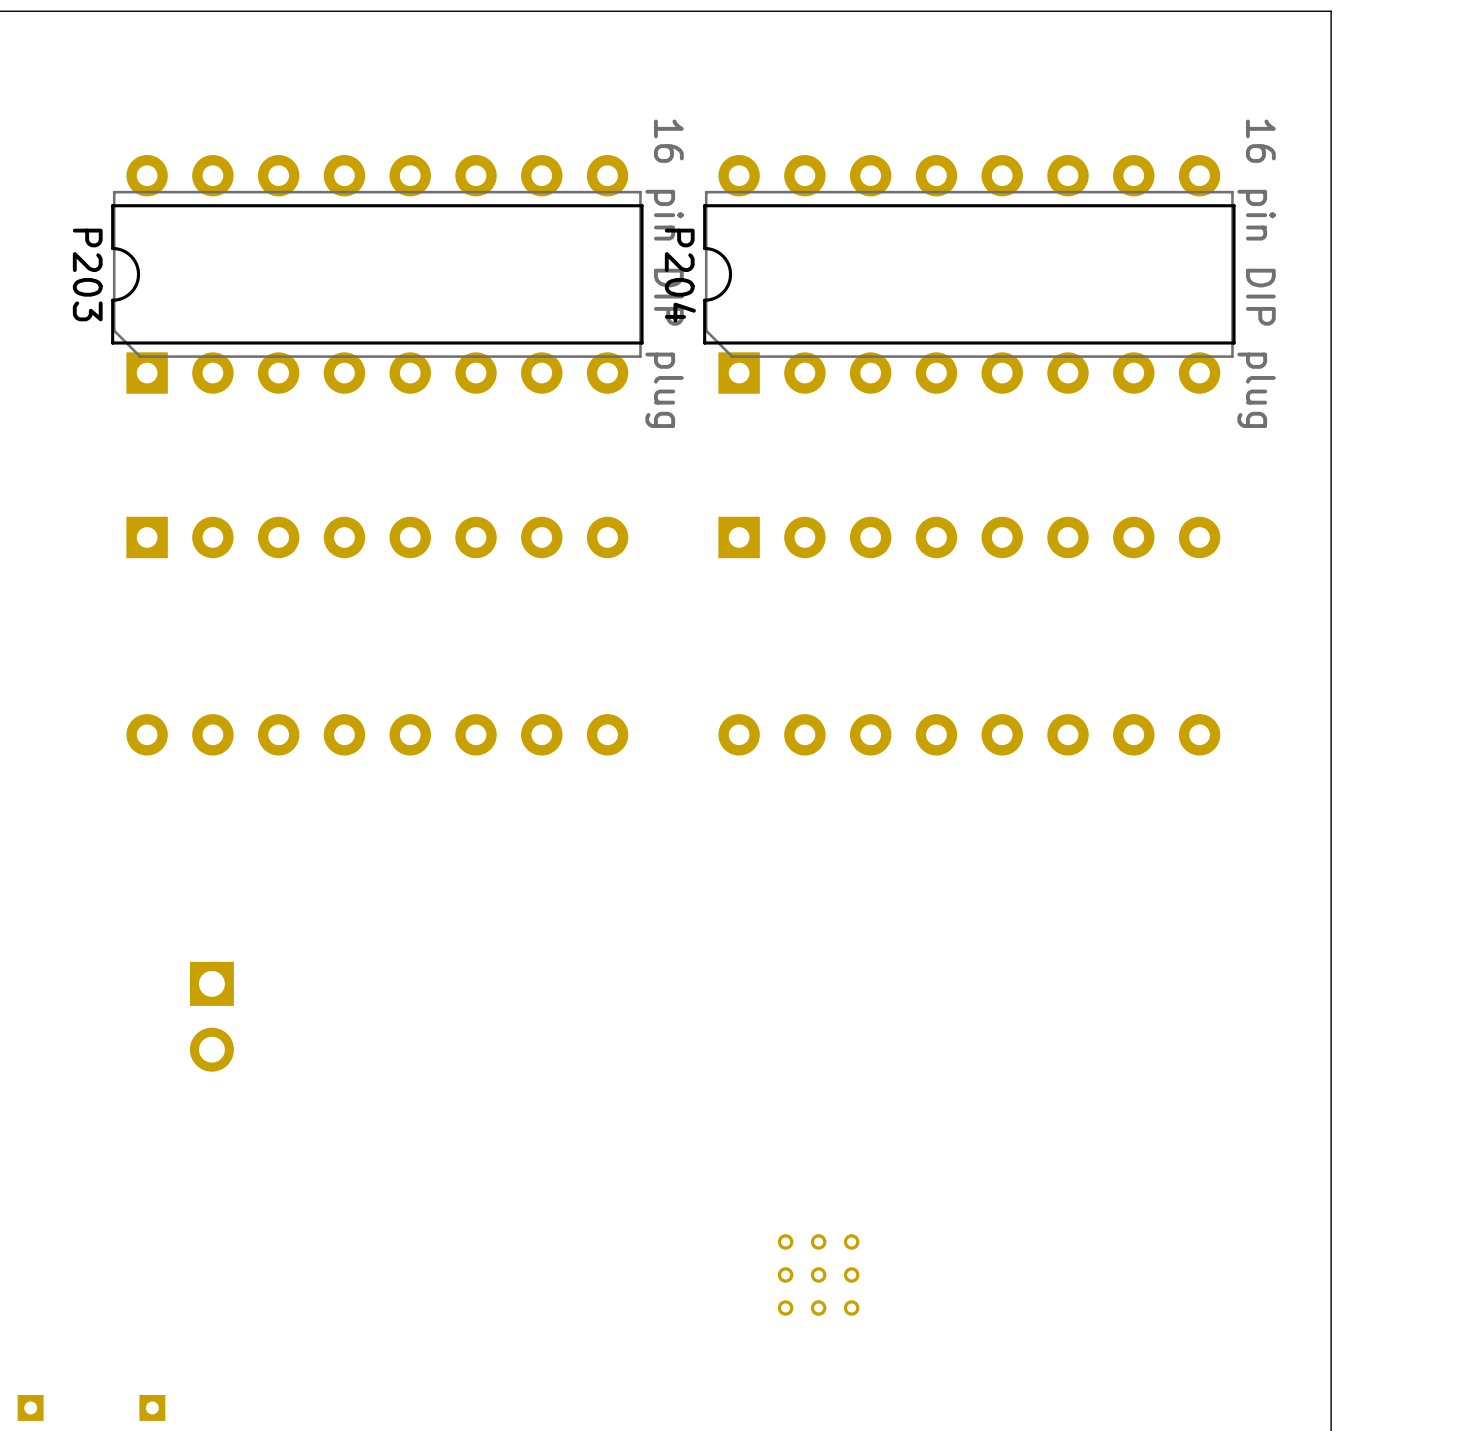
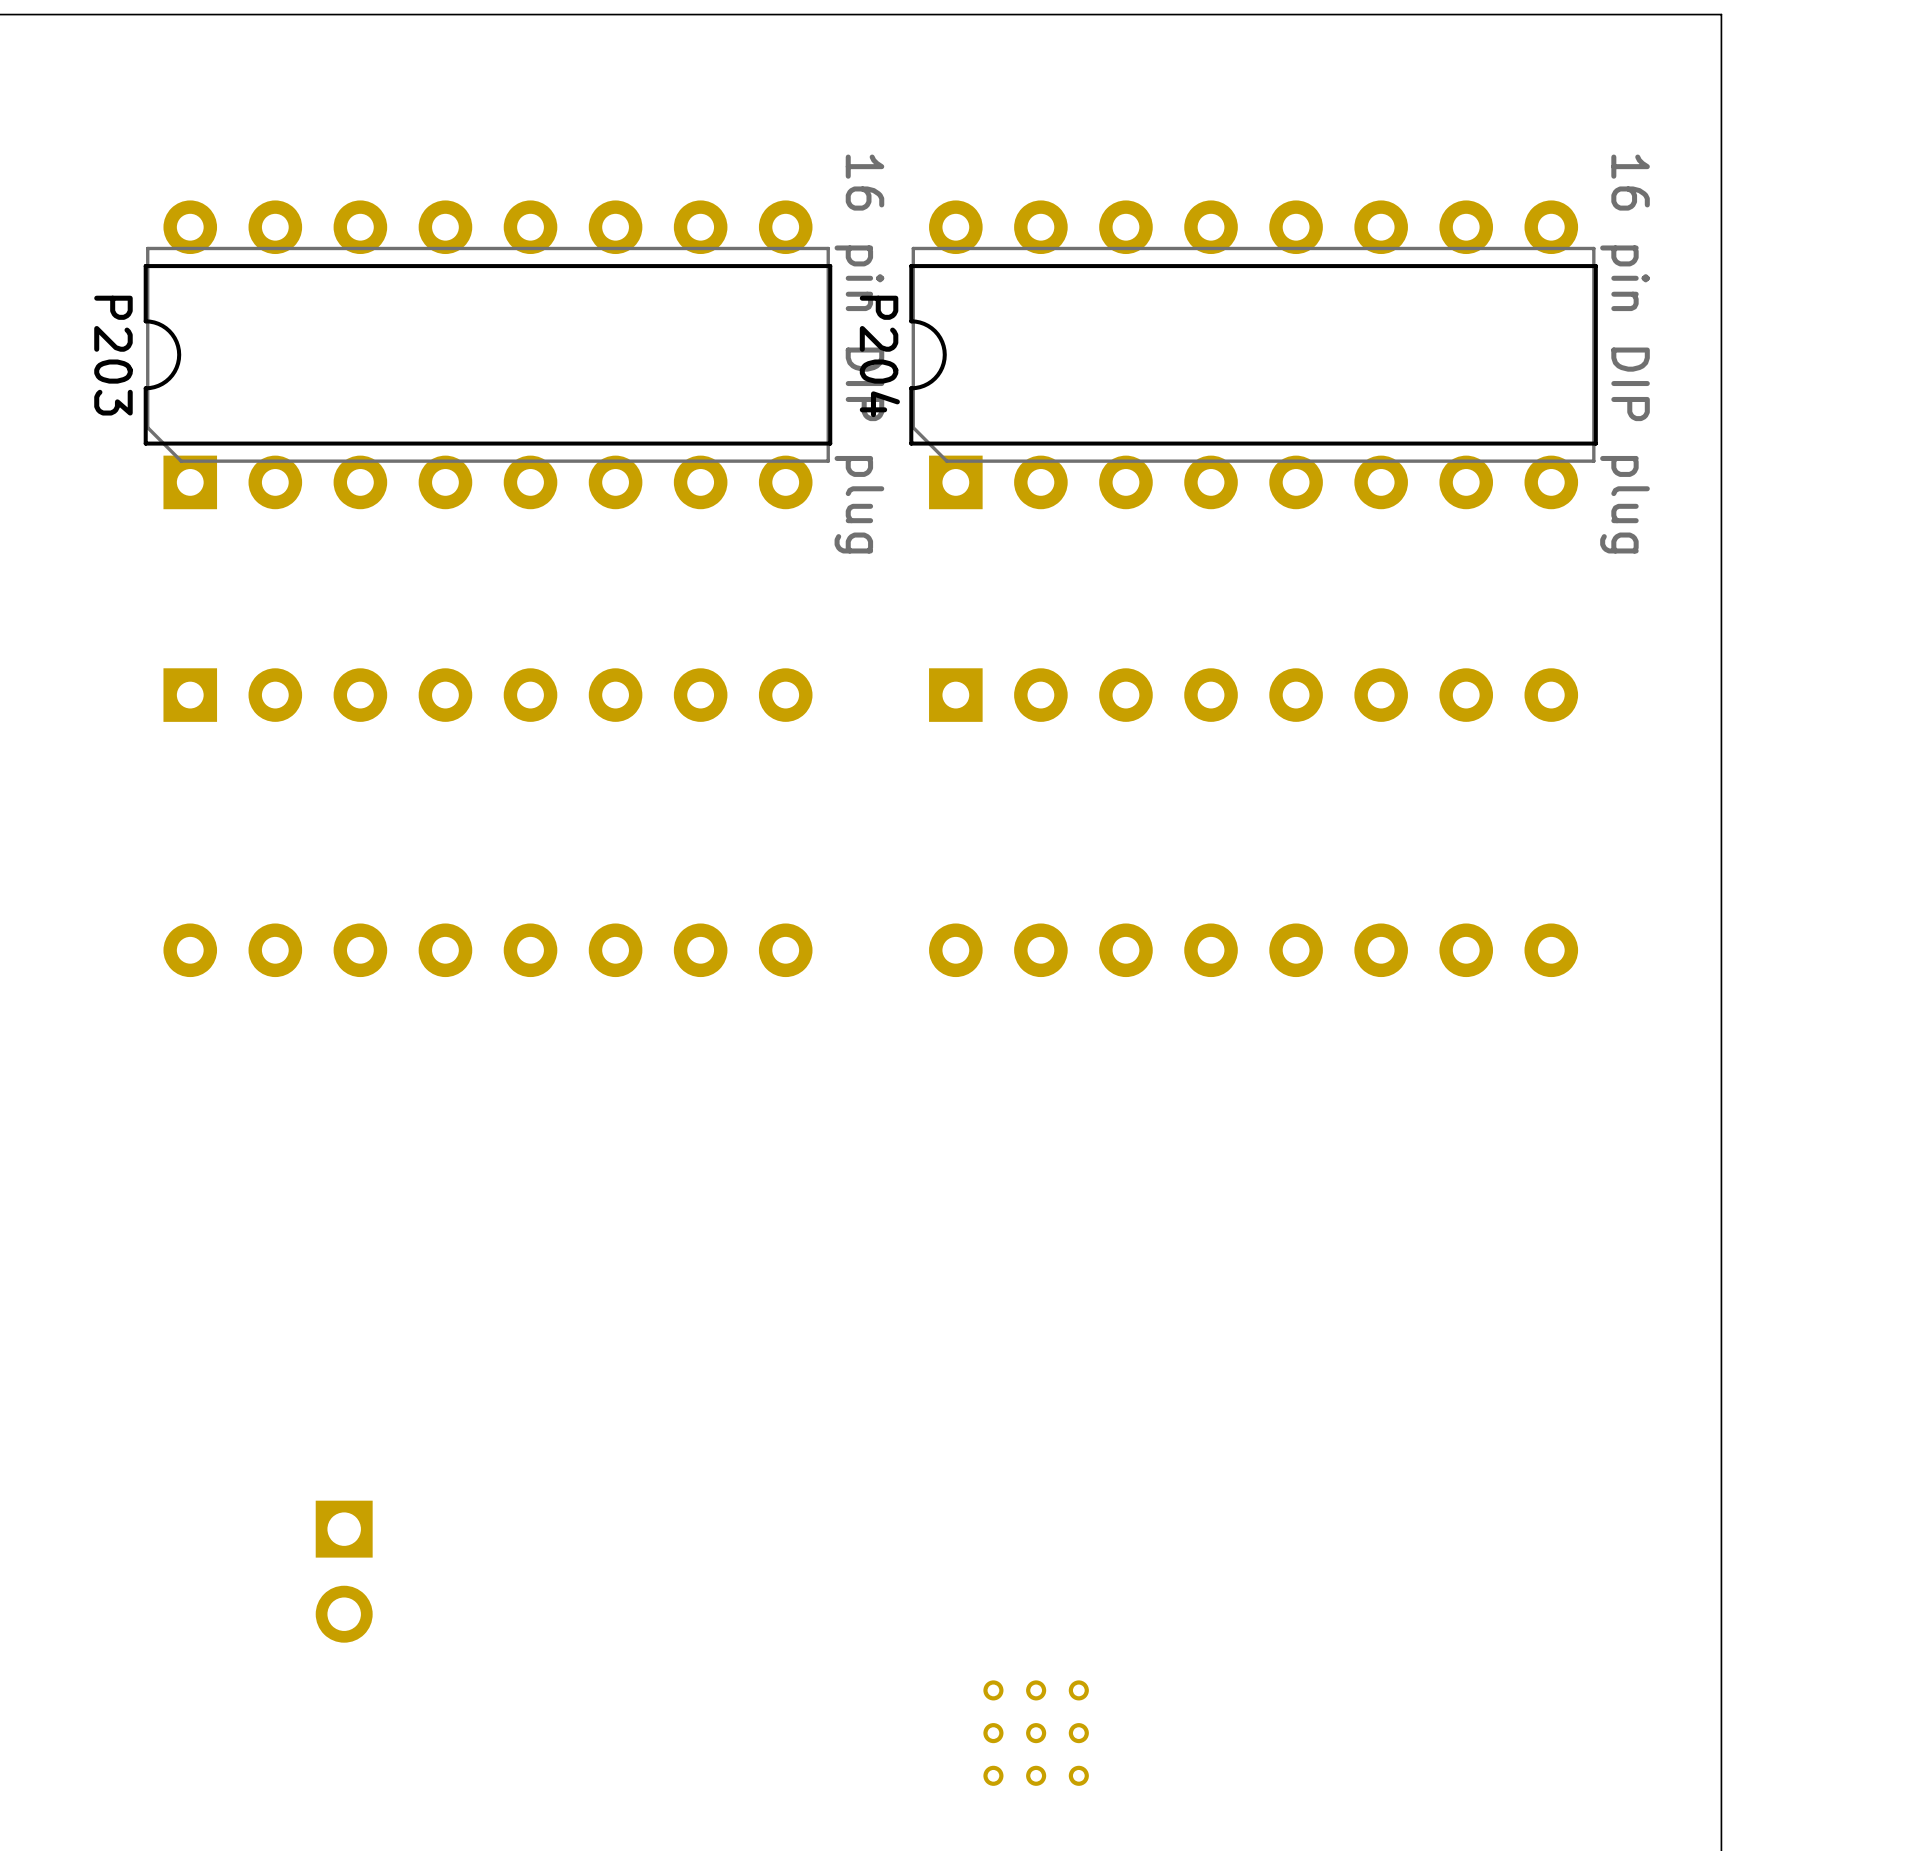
part position: (211, 1016) -> (344, 1571)
part position: (818, 1274) -> (1036, 1733)
part: (30, 1407) -> none
part: (152, 1407) -> none

